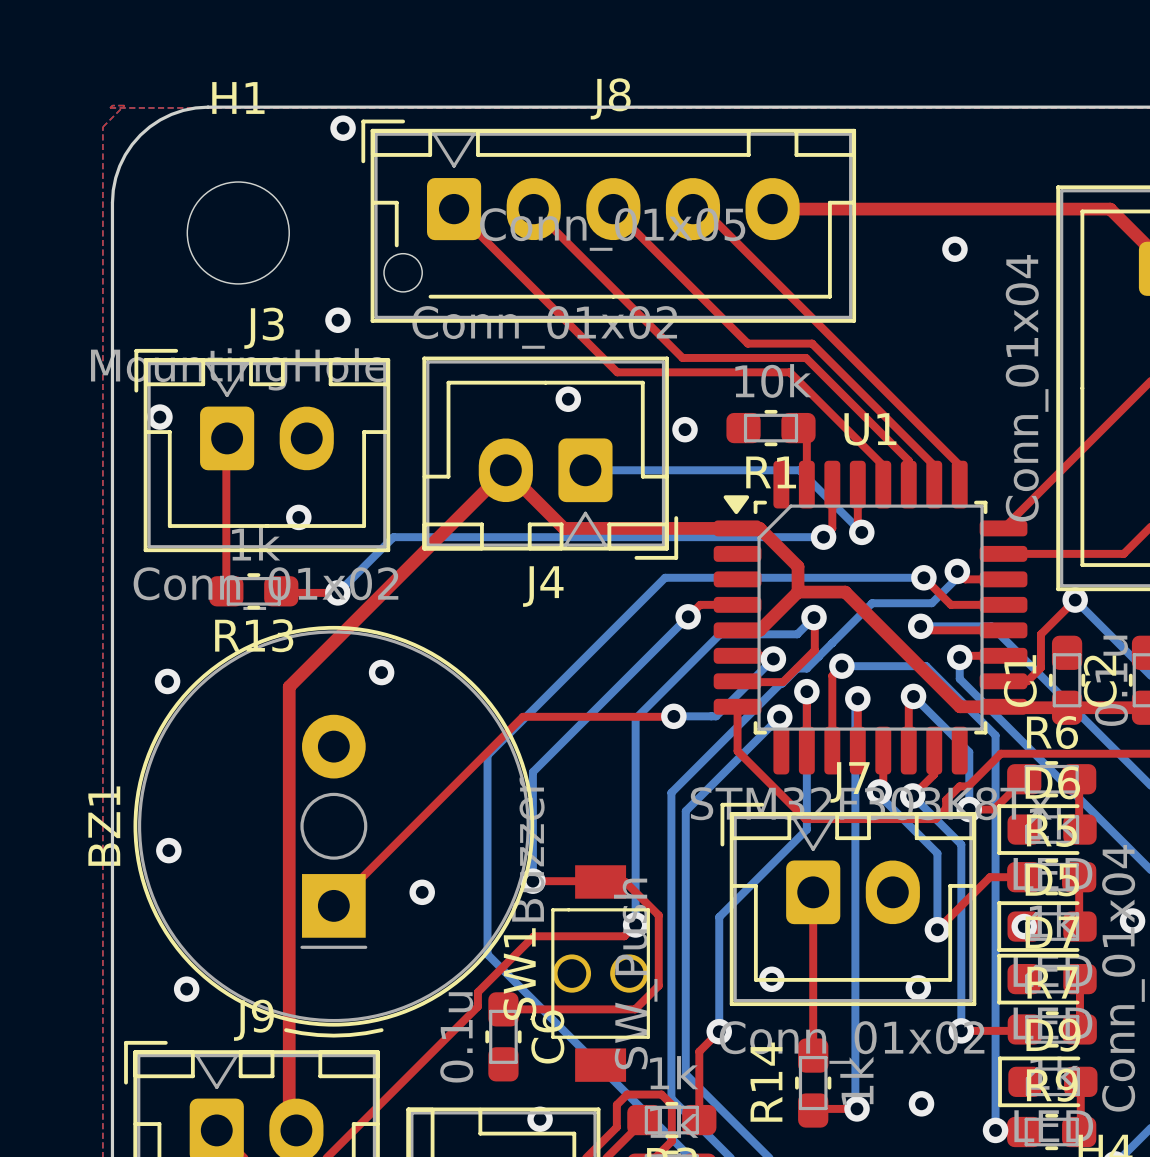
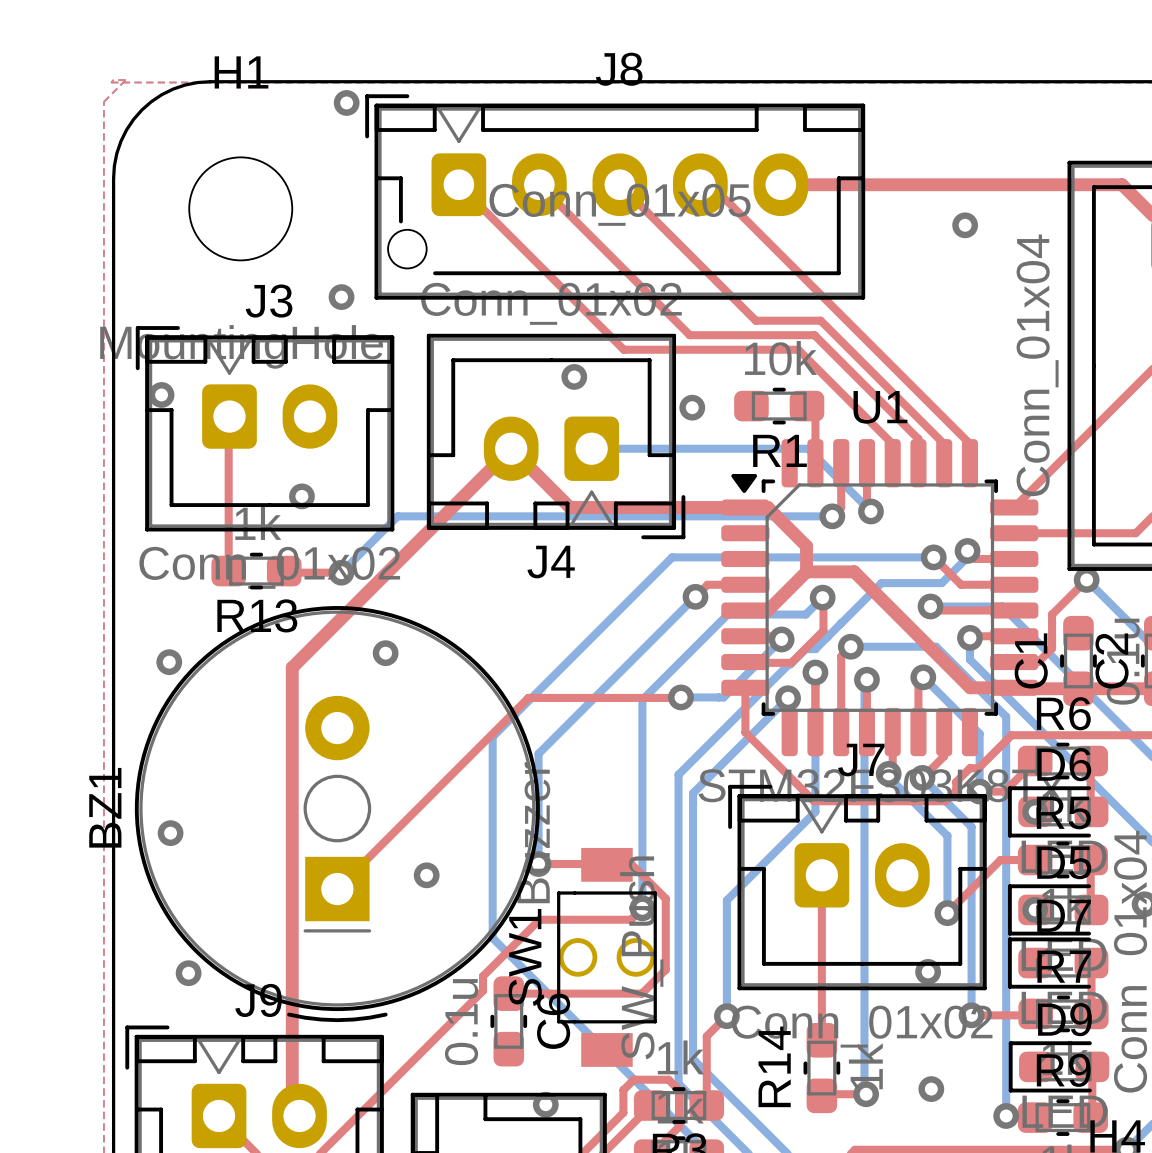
via: none -> (1035, 811)
via: (771, 979) -> none

